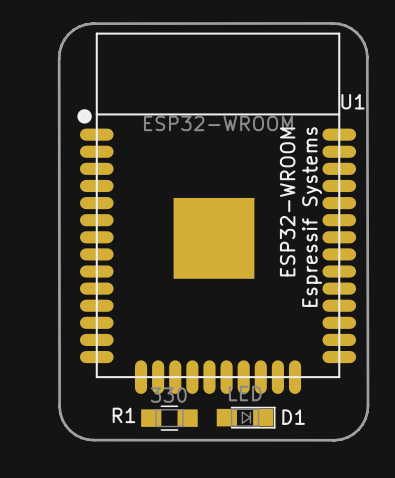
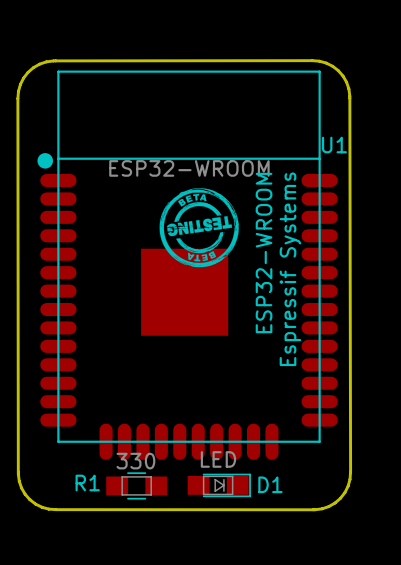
drawing: none -> [159, 188, 239, 268]

